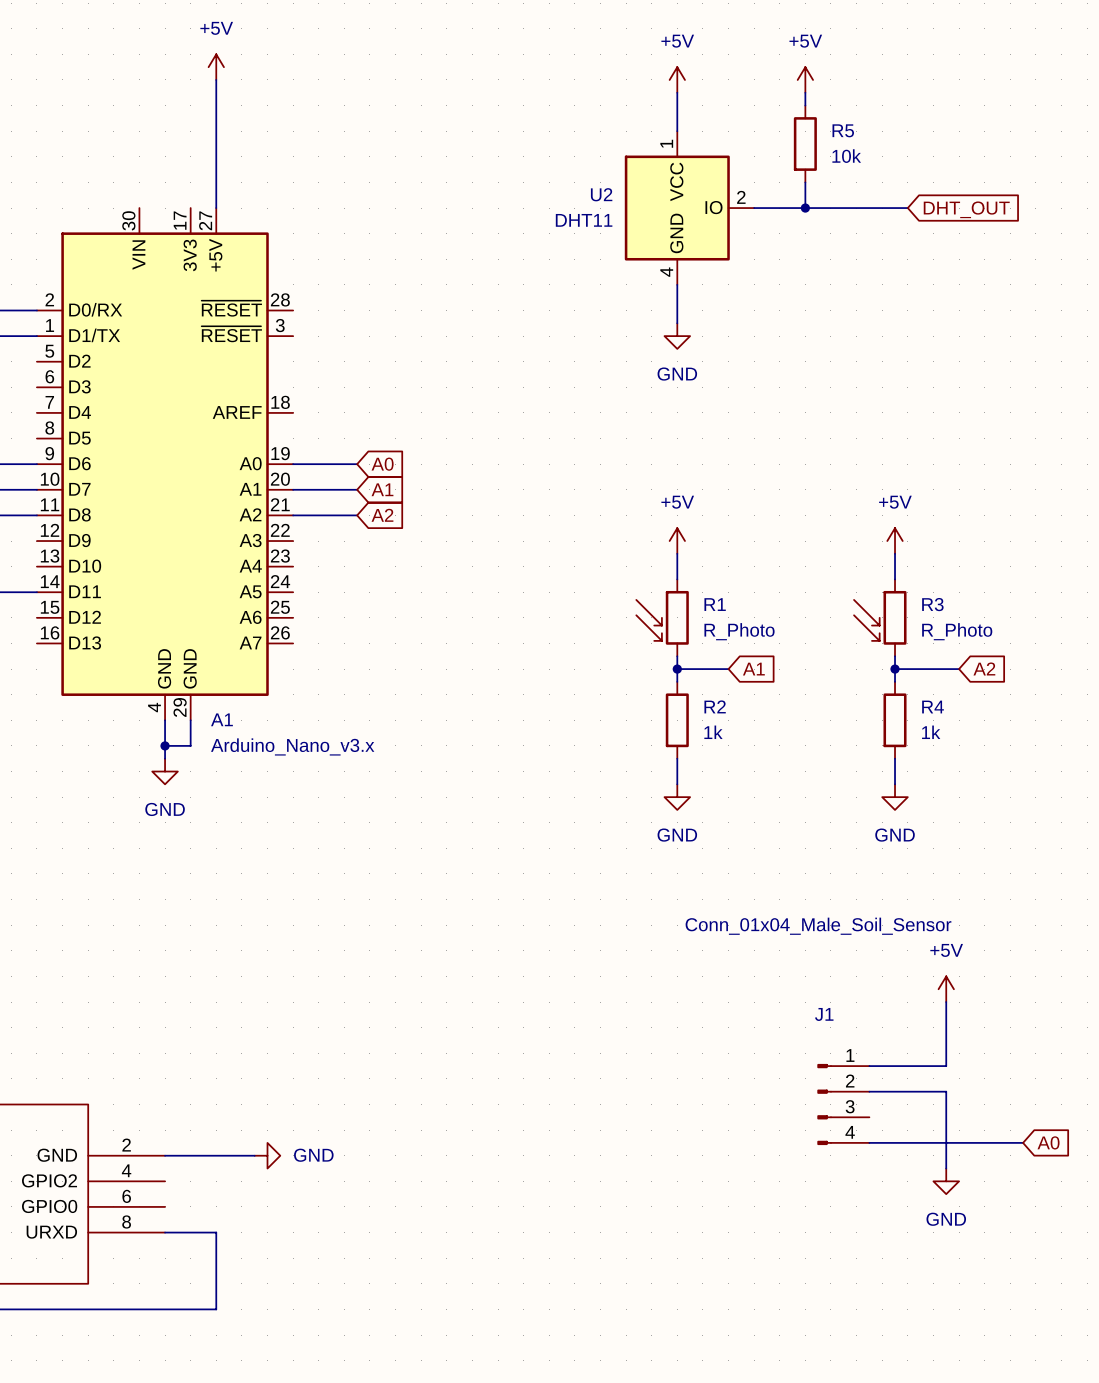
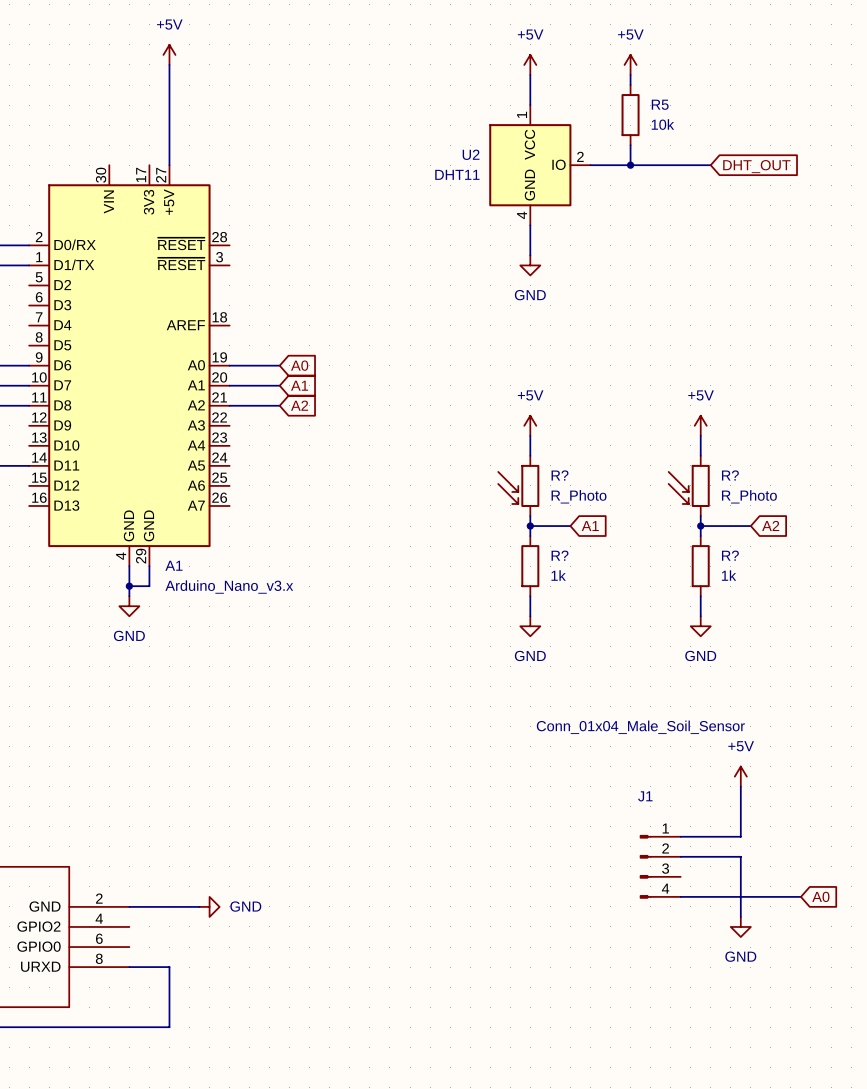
R1 name: R1 (715, 604) -> R? (560, 475)
R3 name: R3 (932, 604) -> R? (730, 475)
R2 name: R2 (715, 706) -> R? (560, 555)
R4 name: R4 (933, 707) -> R? (730, 555)

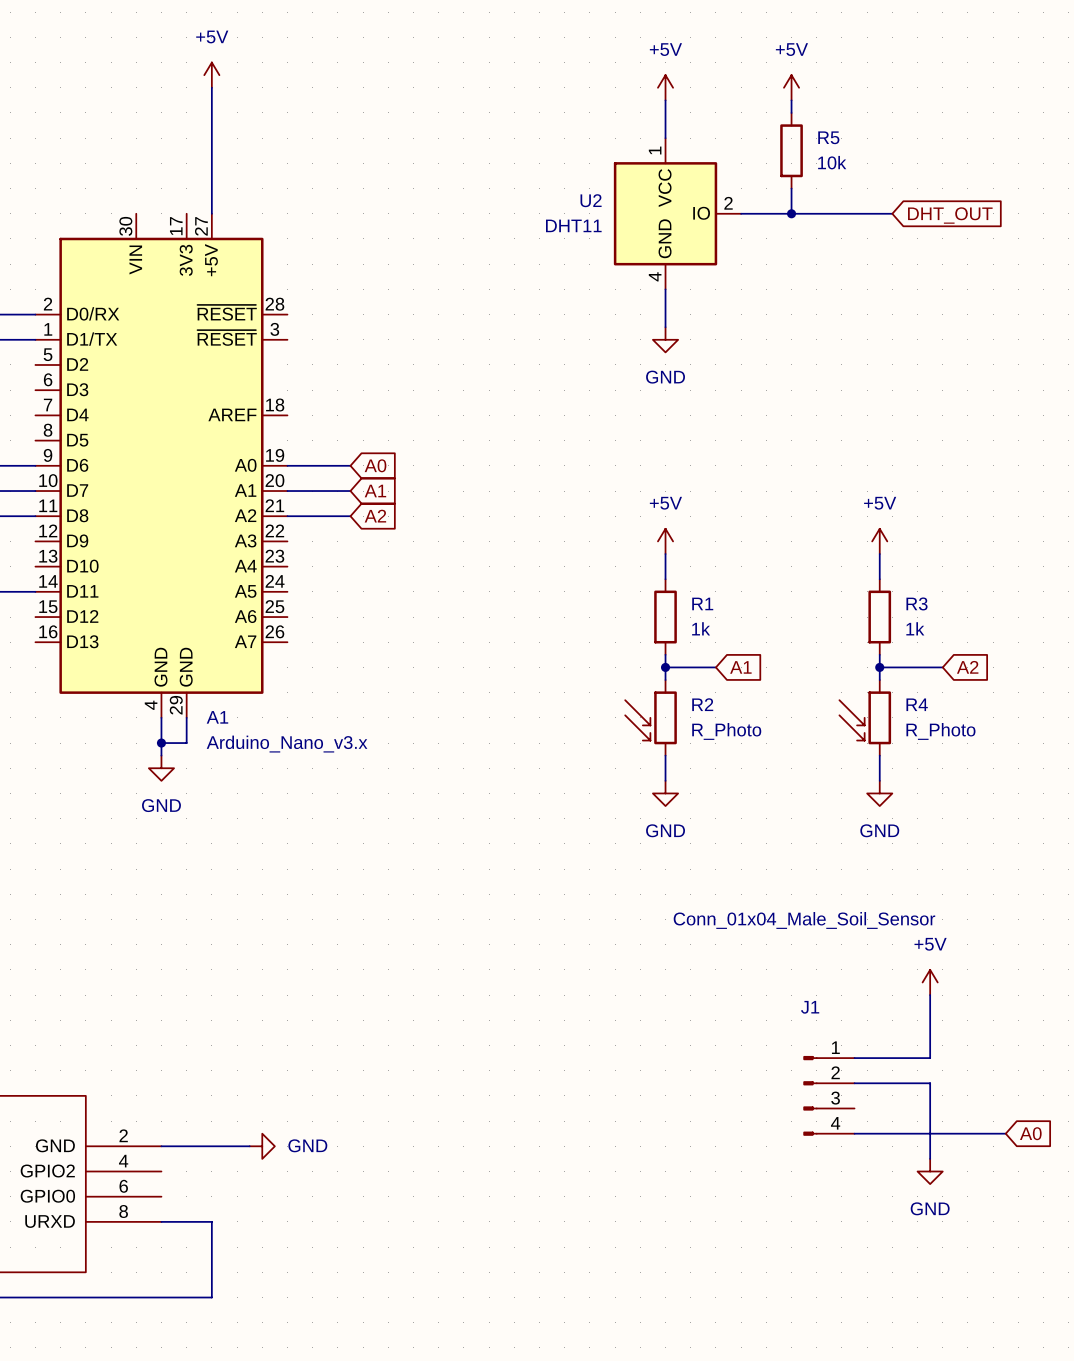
R?: R_Photo (518, 485) -> none
R1: none -> 1k (665, 617)
R?: R_Photo (689, 485) -> none
R3: none -> 1k (879, 617)
R2: none -> R_Photo (651, 717)
R?: 1k (530, 566) -> none
R4: none -> R_Photo (865, 717)
R?: 1k (700, 566) -> none

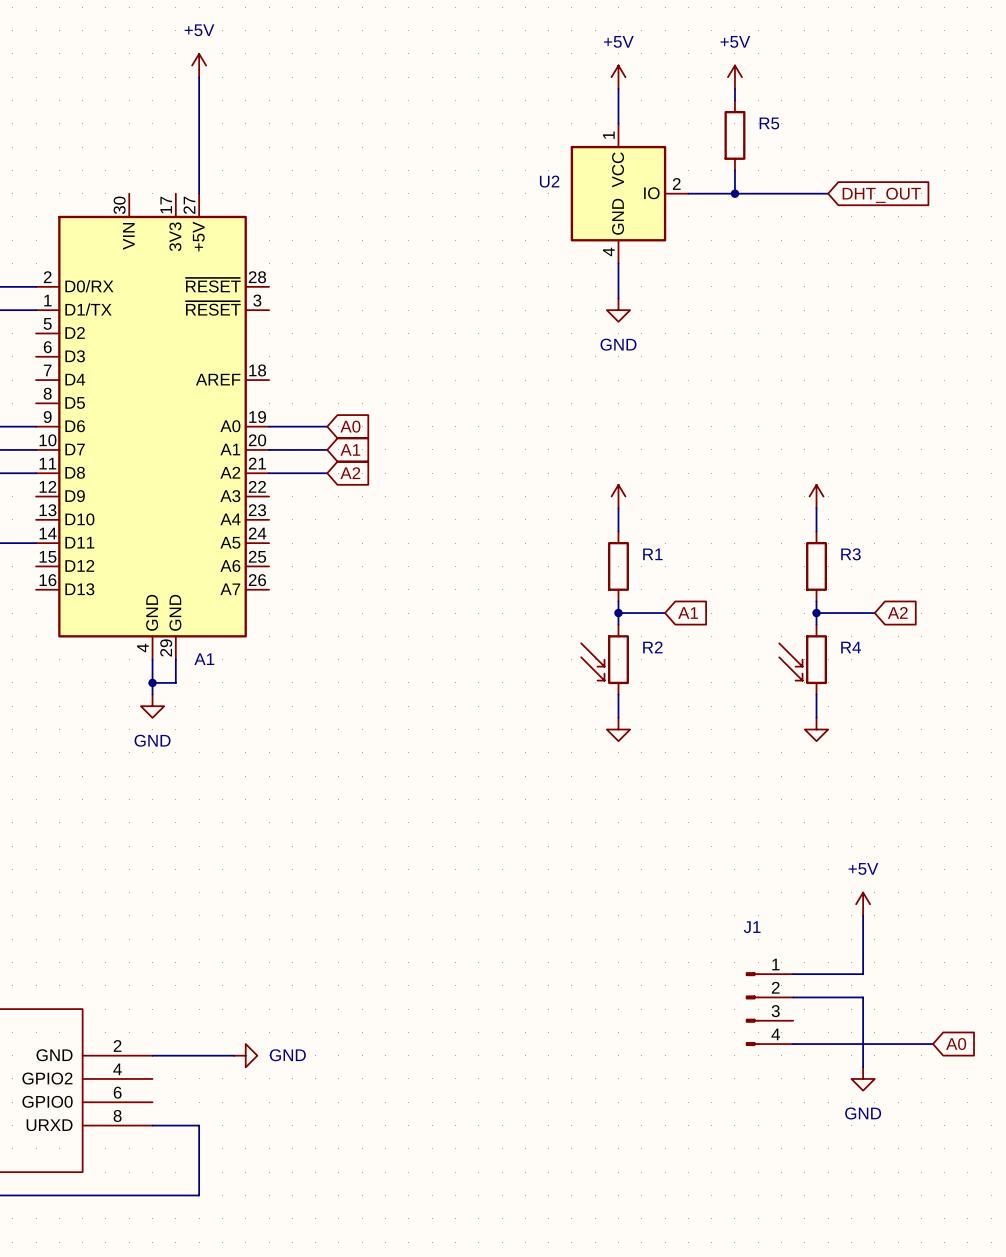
R5 value: 10k (832, 162) -> none
U2 value: DHT11 (573, 225) -> none
power symbol text: +5V (665, 503) -> none
power symbol text: +5V (880, 503) -> none
R1 value: 1k (701, 628) -> none
R3 value: 1k (915, 628) -> none
R2 value: R_Photo (726, 731) -> none
R4 value: R_Photo (940, 731) -> none
A1 value: Arduino_Nano_v3.x (287, 744) -> none
power symbol text: GND (665, 830) -> none
power symbol text: GND (879, 830) -> none
J1 value: Conn_01x04_Male_Soil_Sensor (804, 920) -> none

